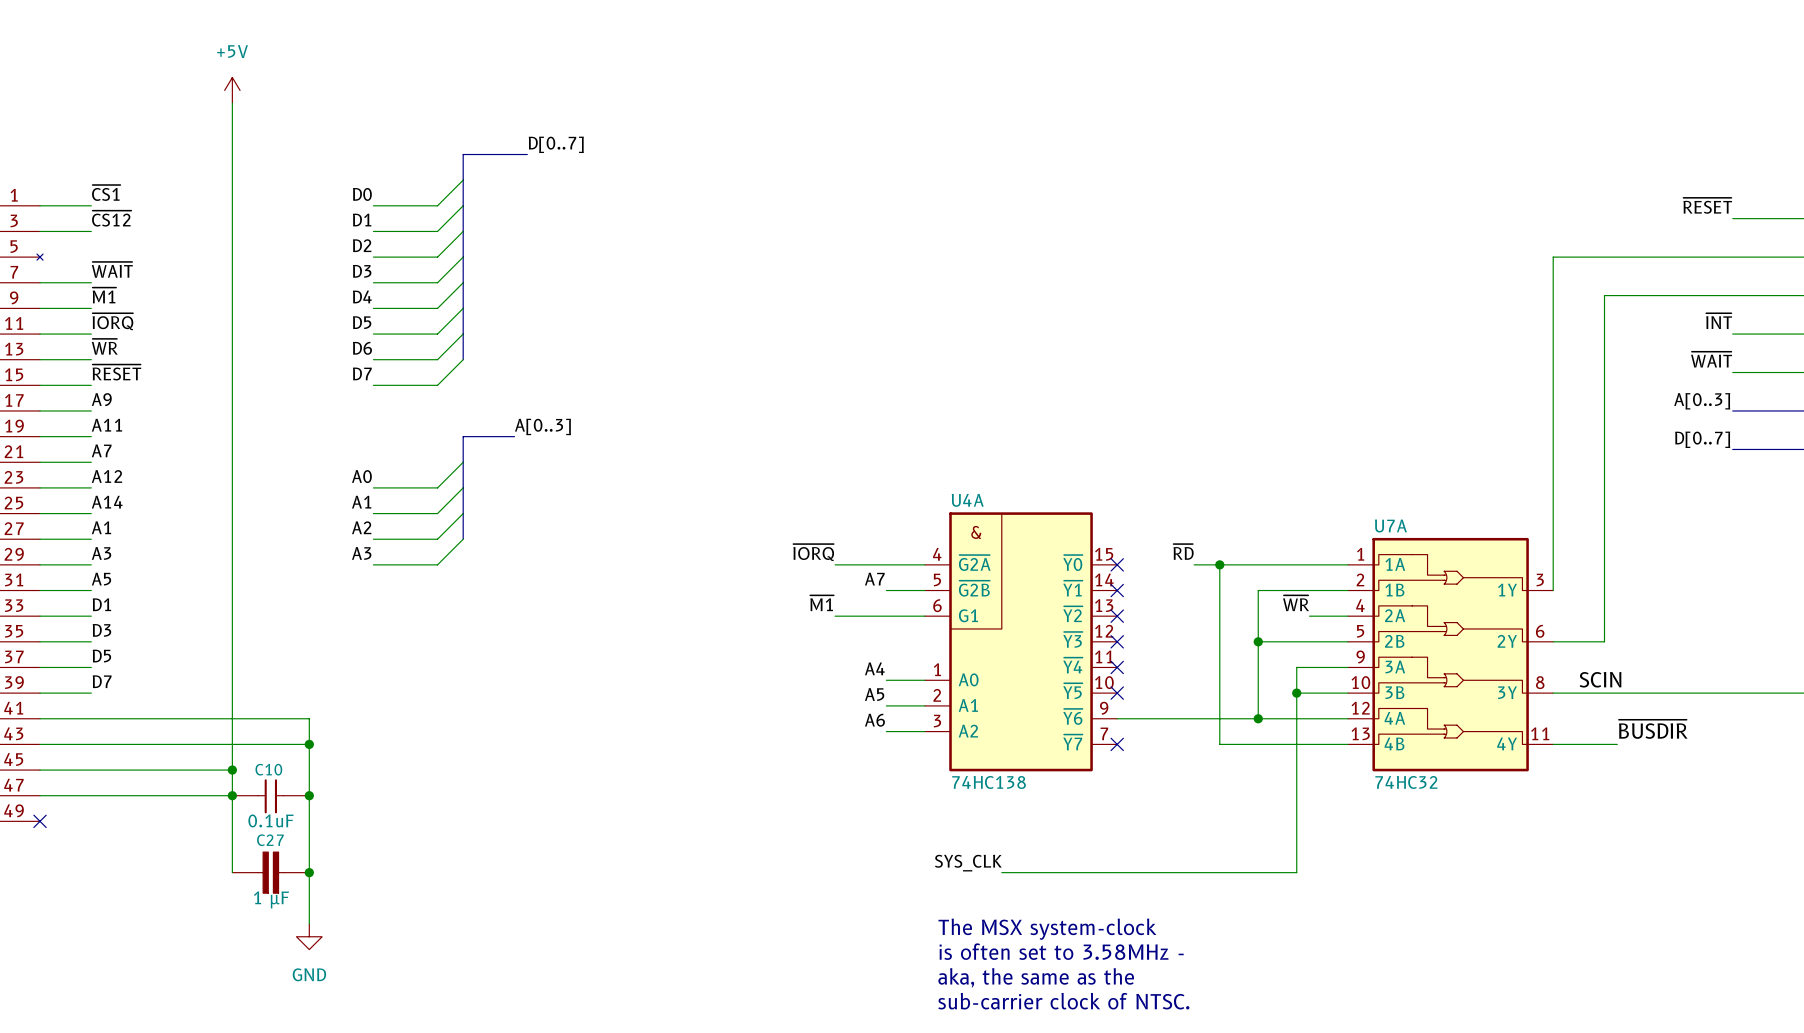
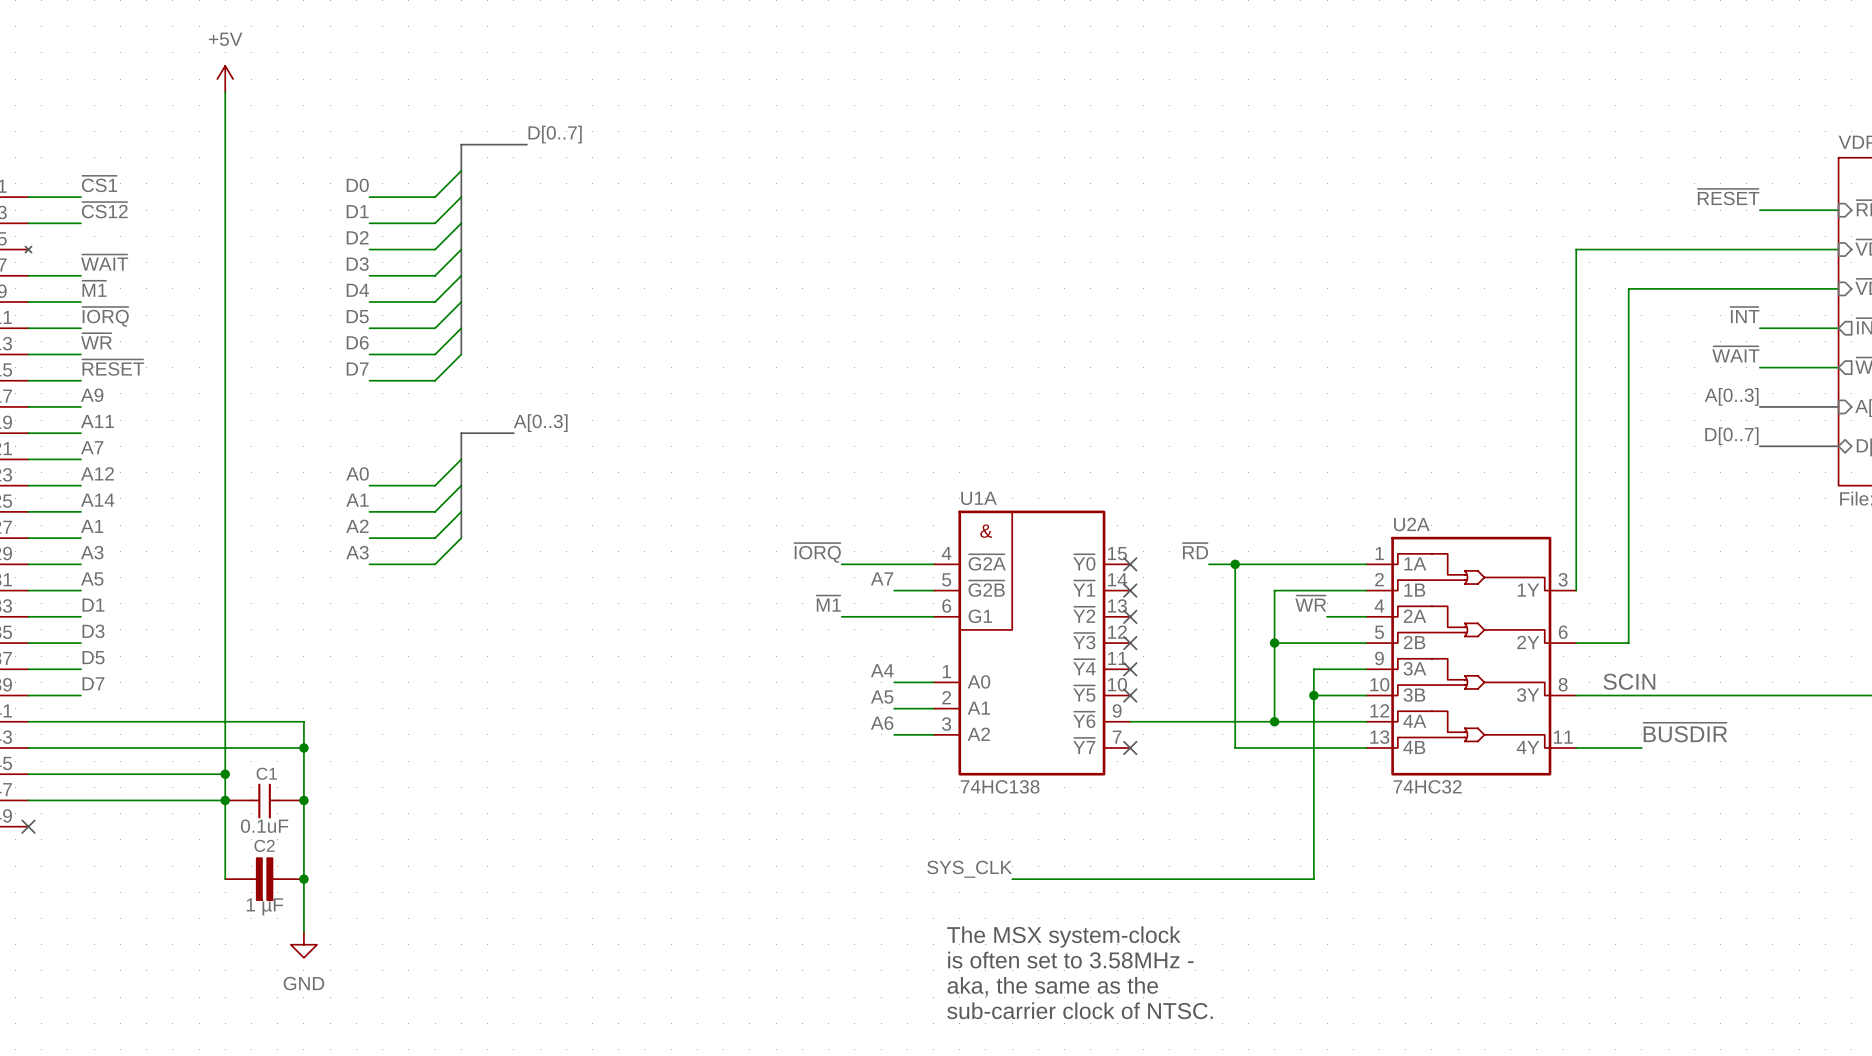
U4A name: U4A (967, 500) -> U1A (979, 498)
U7A name: U7A (1390, 525) -> U2A (1411, 524)
C10 name: C10 (268, 769) -> C1 (266, 773)
C27 name: C27 (270, 840) -> C2 (264, 845)

